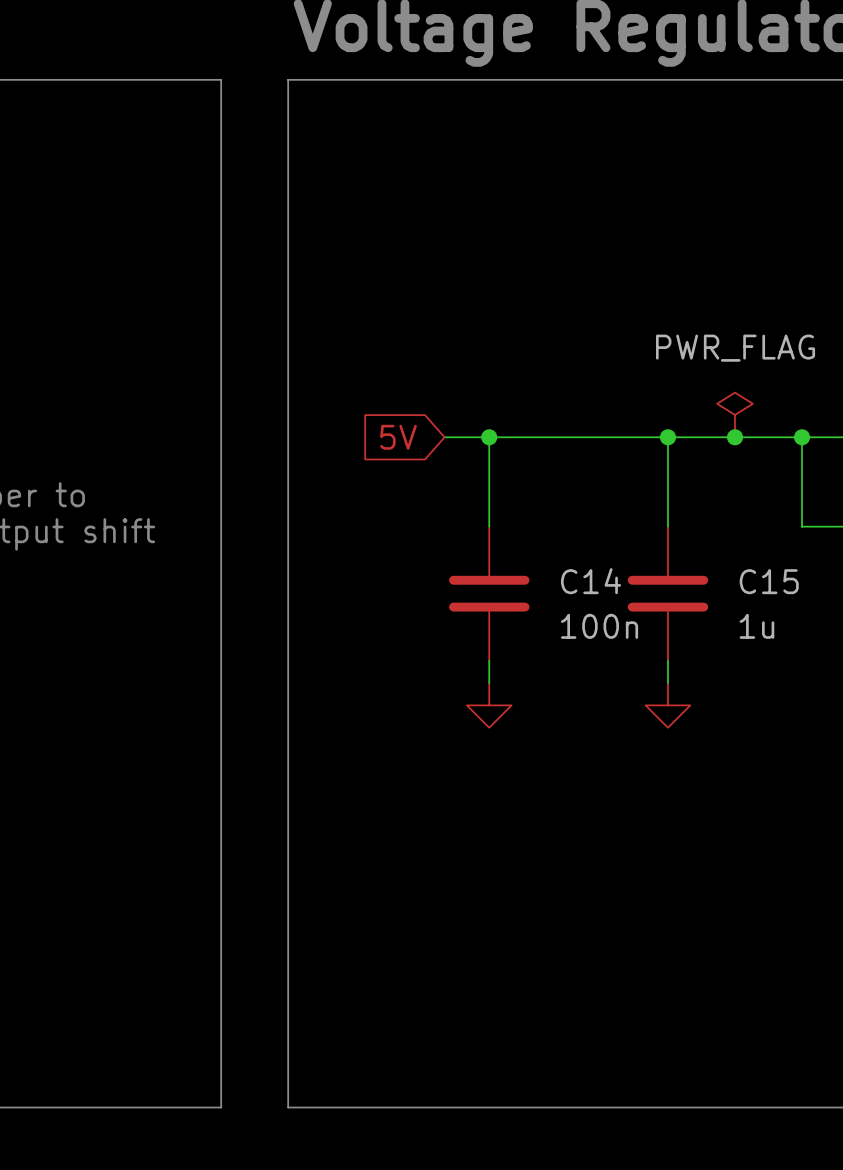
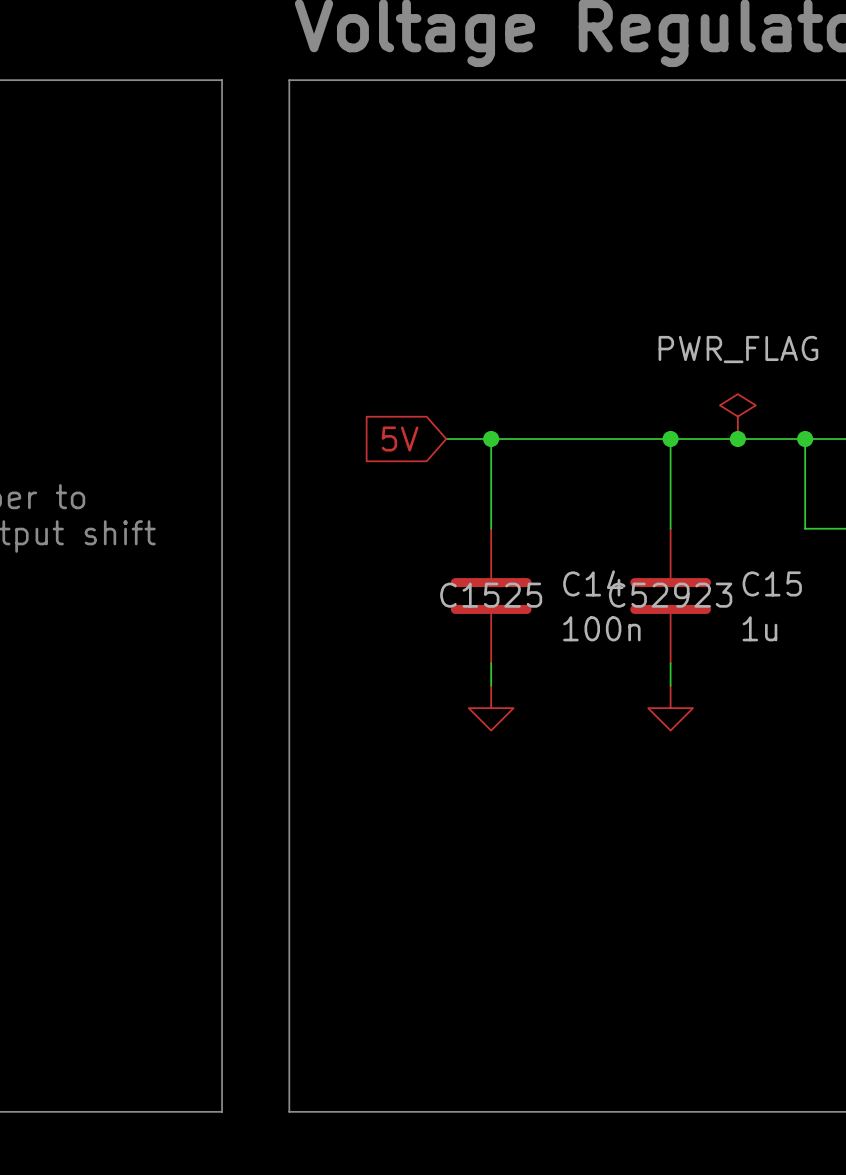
C14 text: none -> C1525 (491, 595)
C15 text: none -> C52923 (670, 595)

